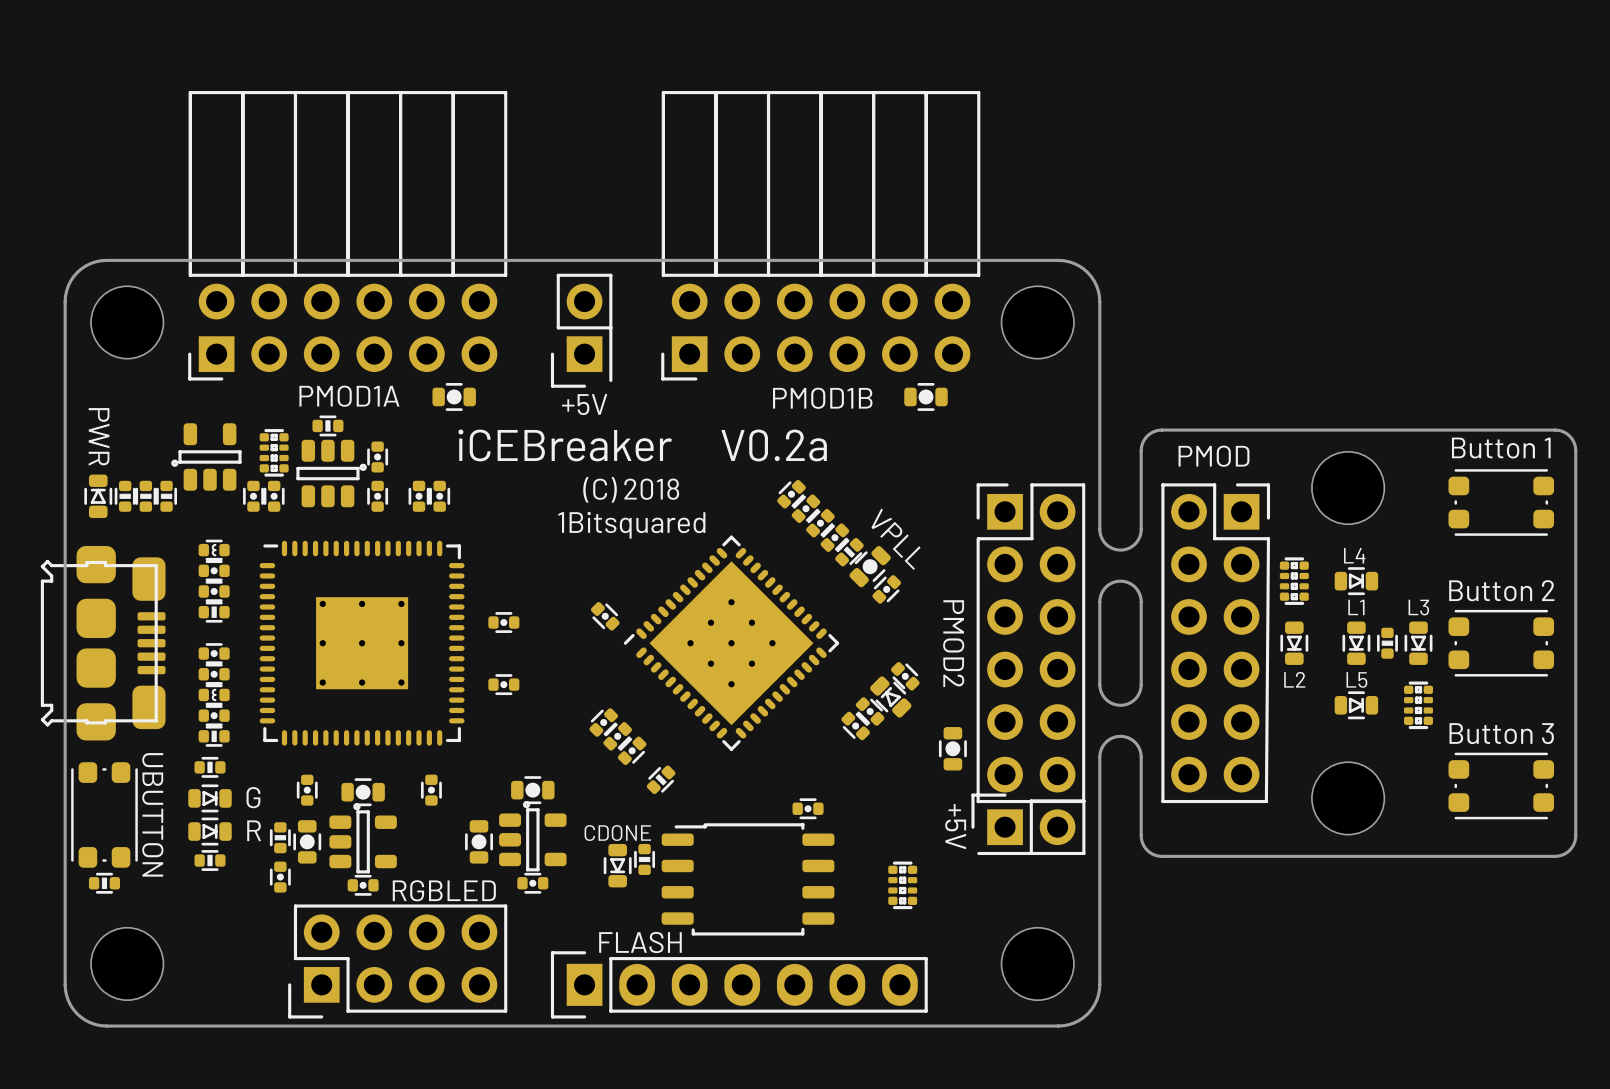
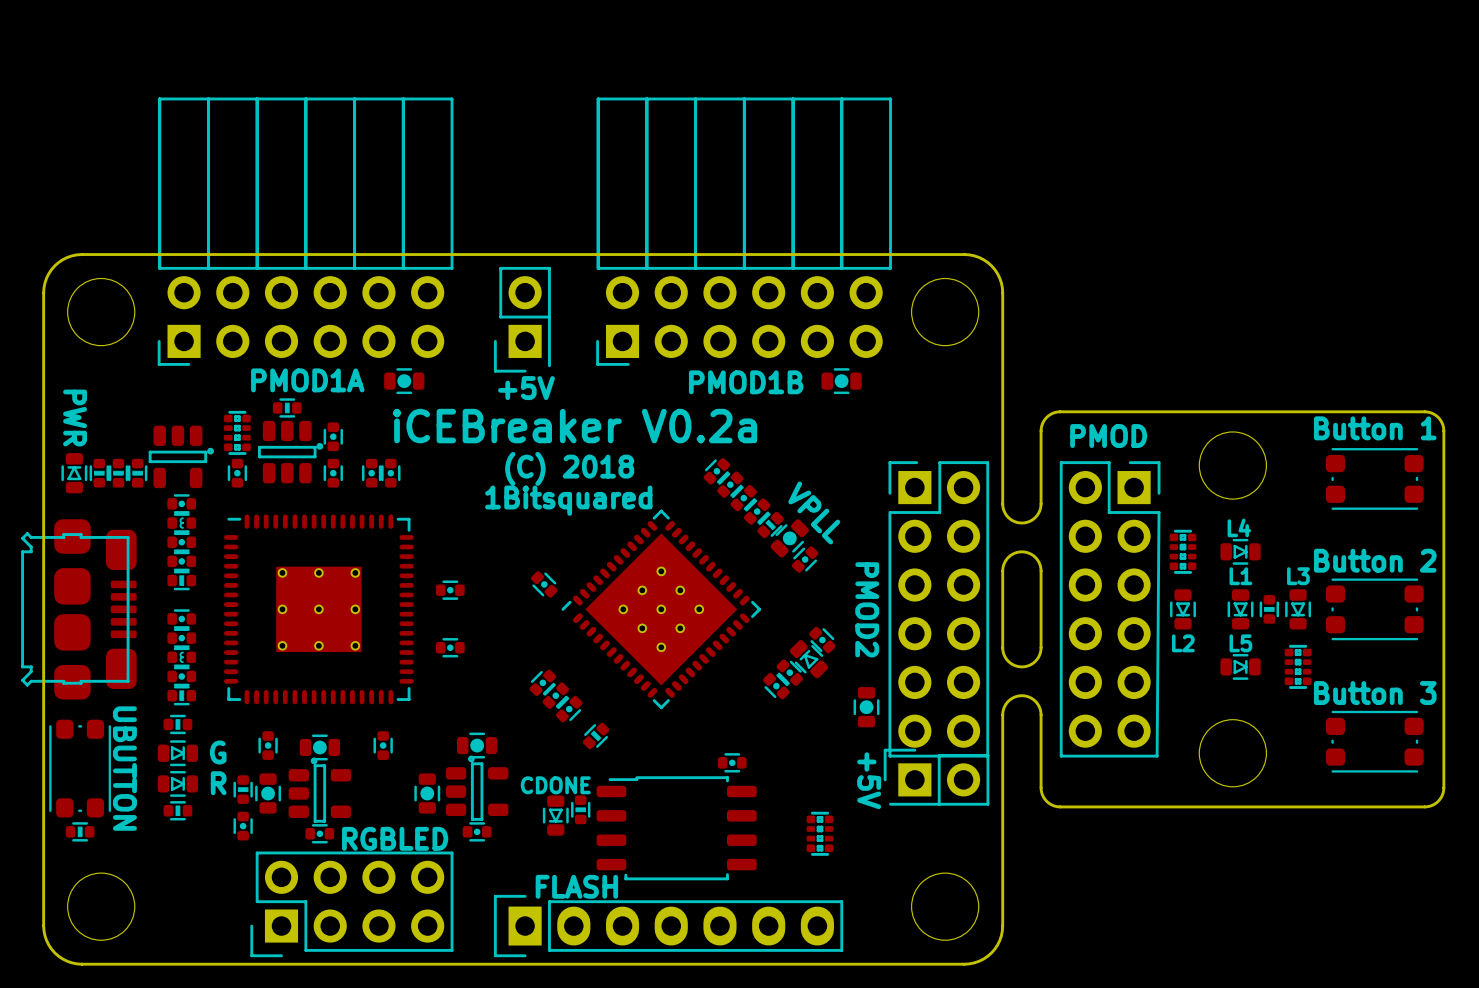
part rotation: 0° (206, 456) -> 180° (181, 456)
part rotation: 0° (253, 496) -> 90° clockwise (181, 503)
part position: (253, 496) -> (181, 503)

